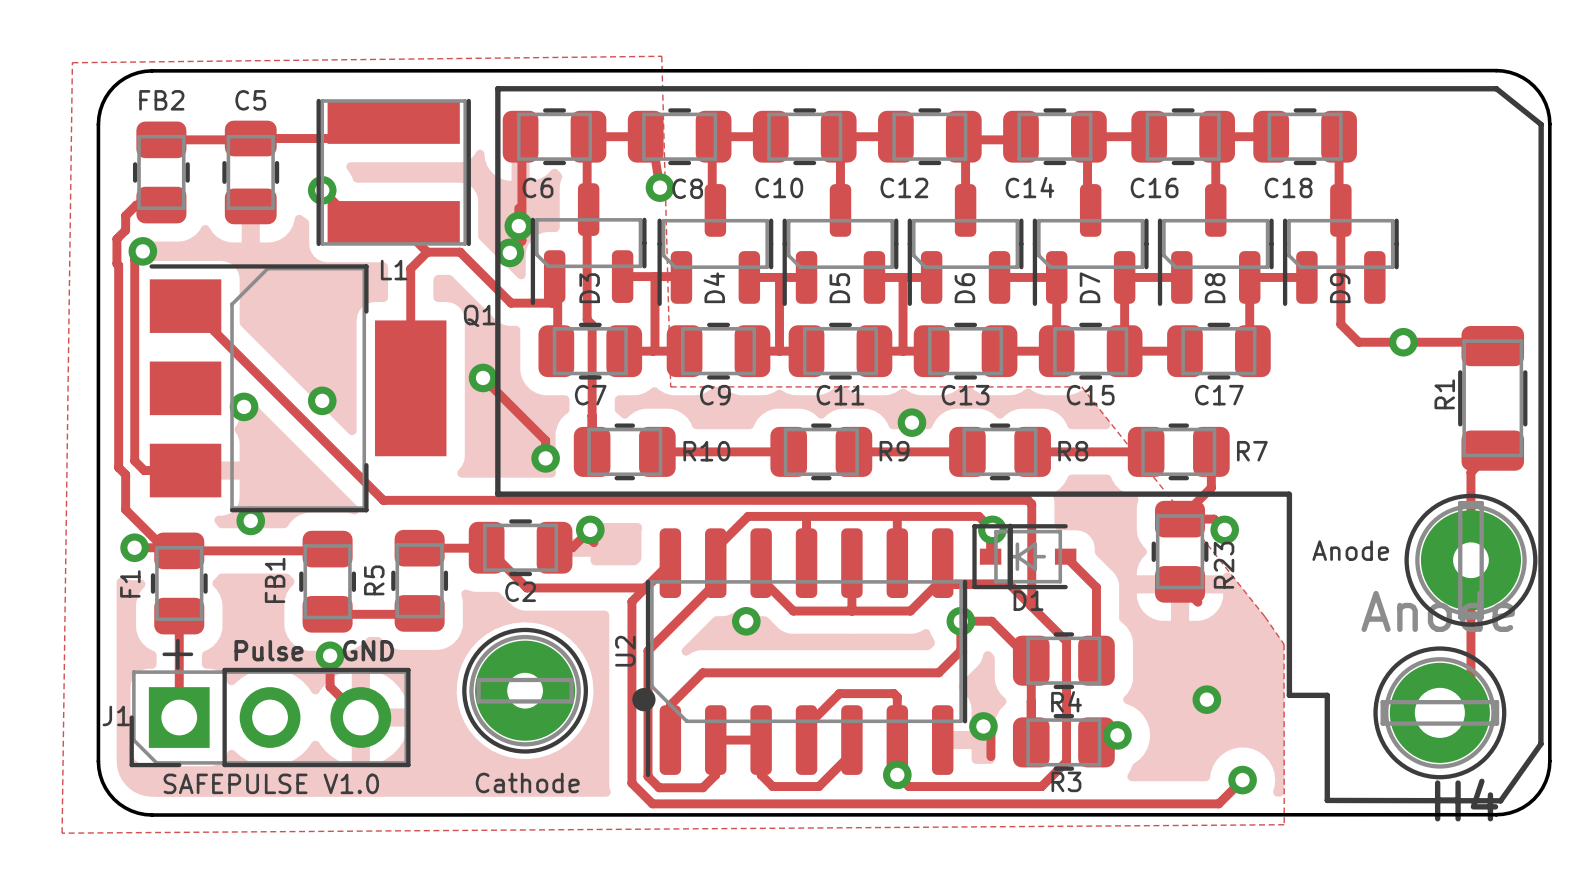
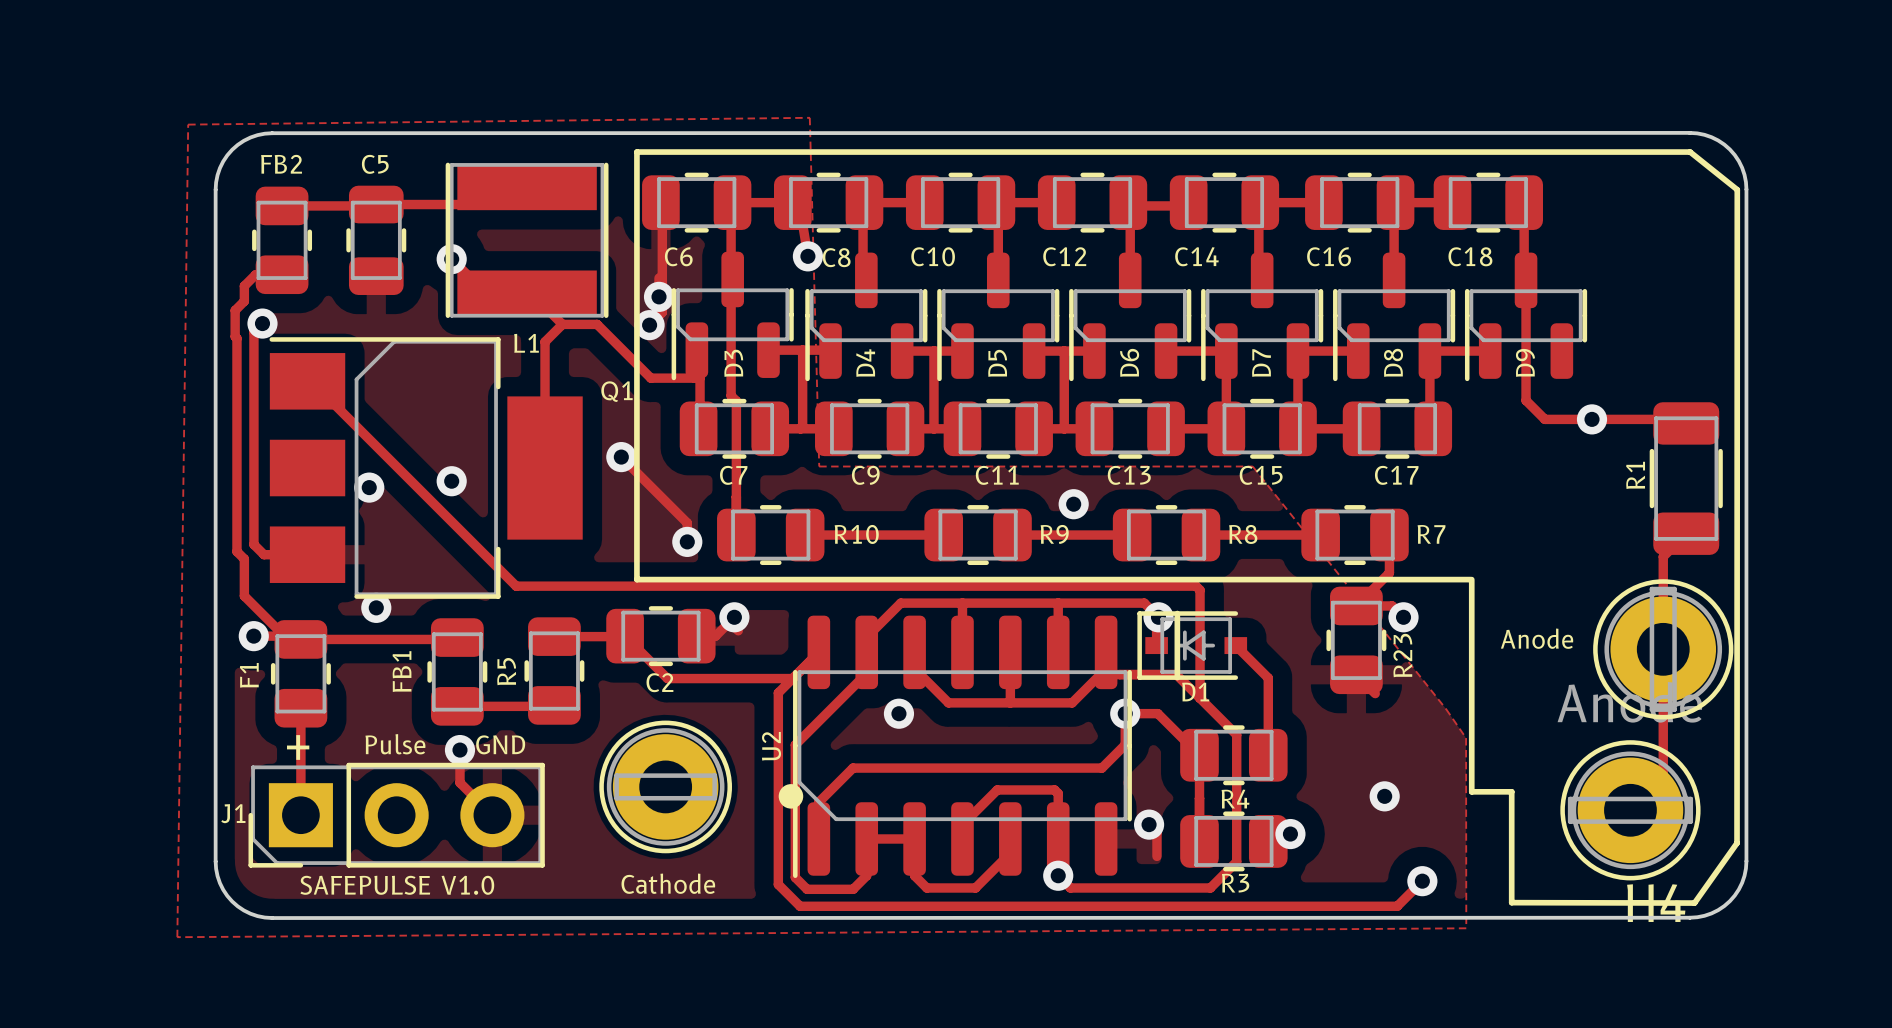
part footprint: [1404, 493, 1538, 627] -> [1593, 579, 1734, 720]
part footprint: [462, 627, 589, 754] -> [599, 720, 733, 854]

